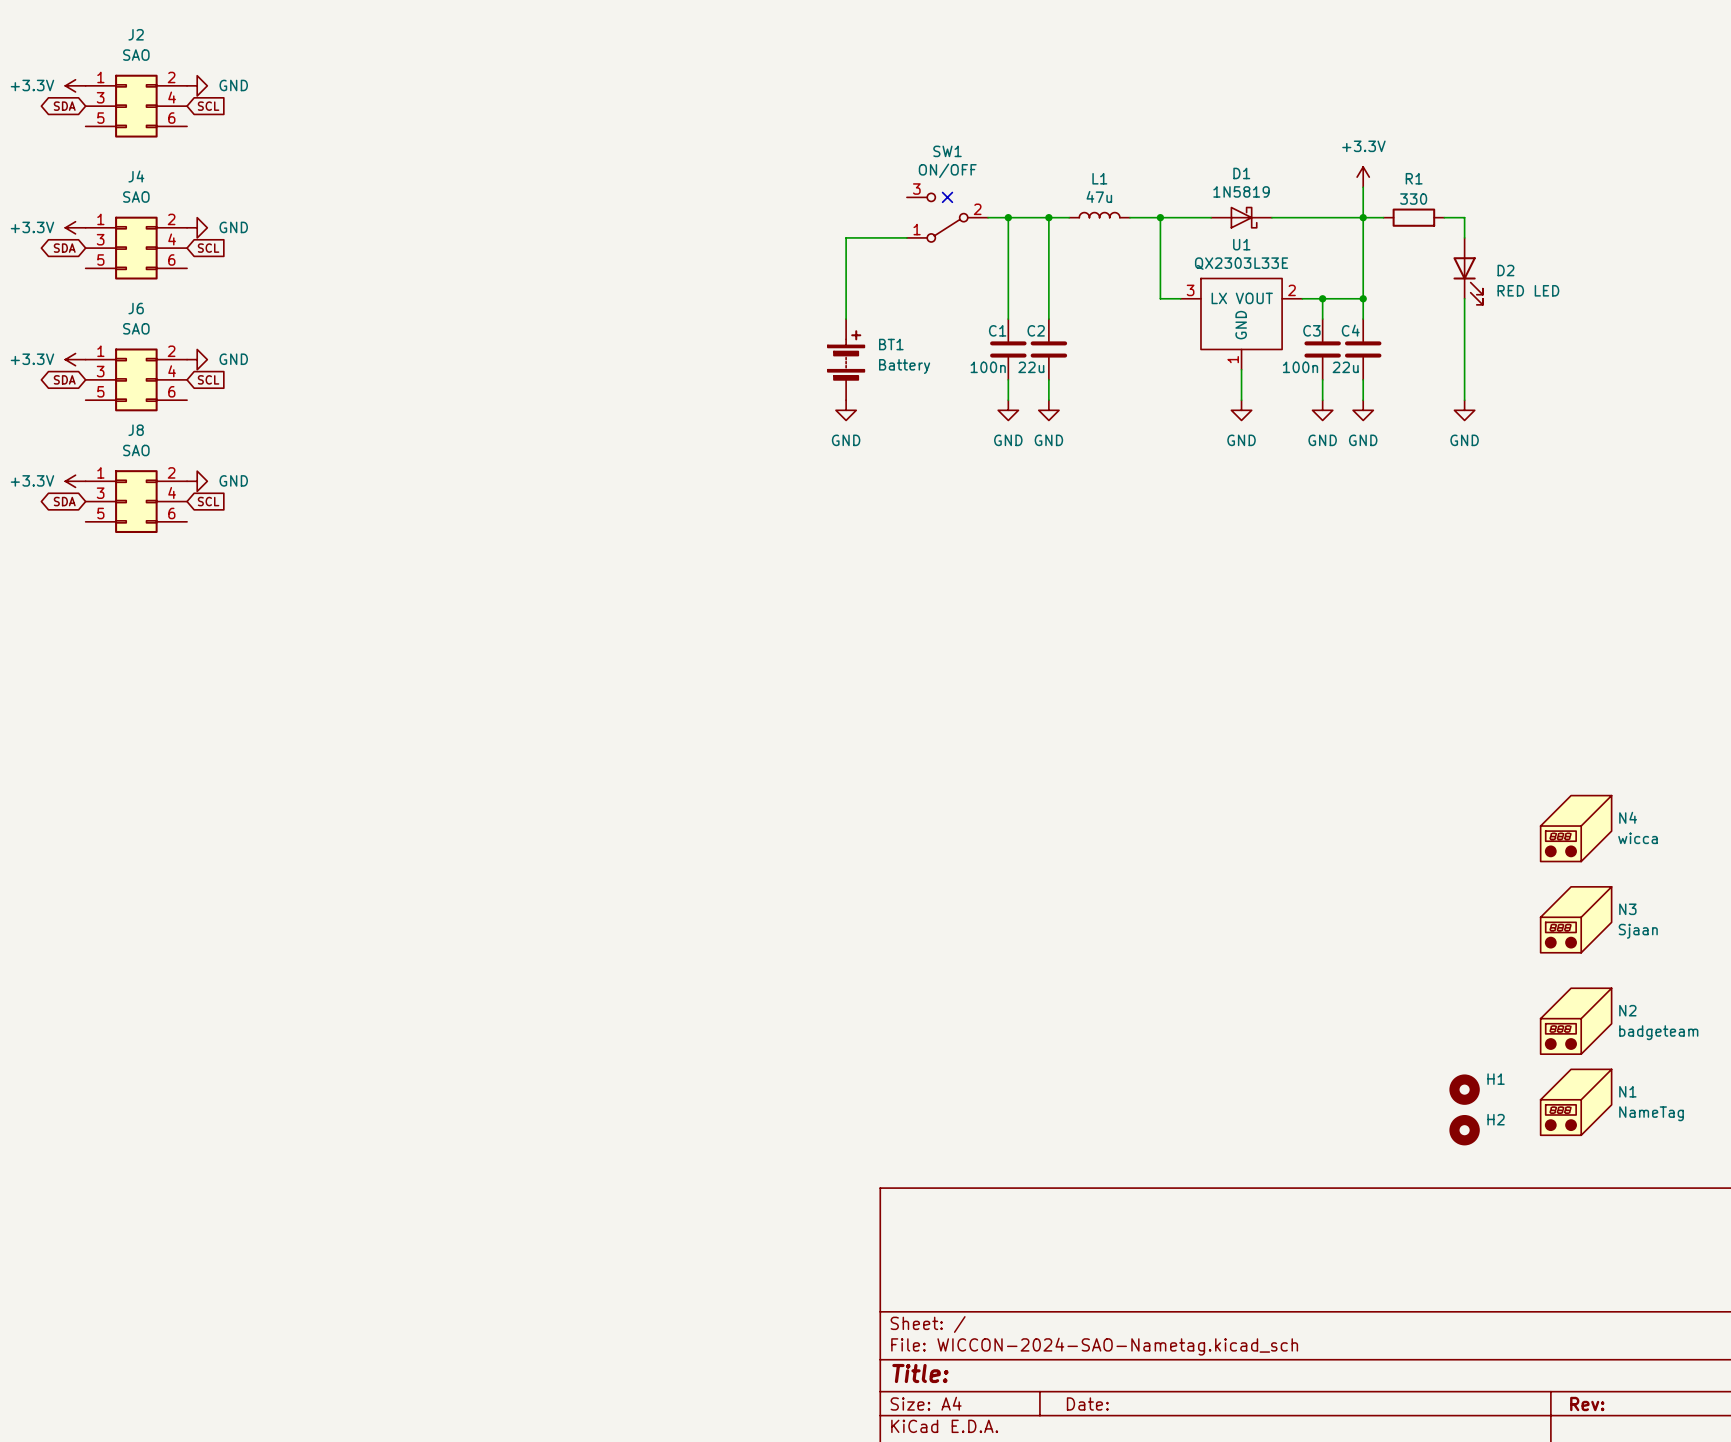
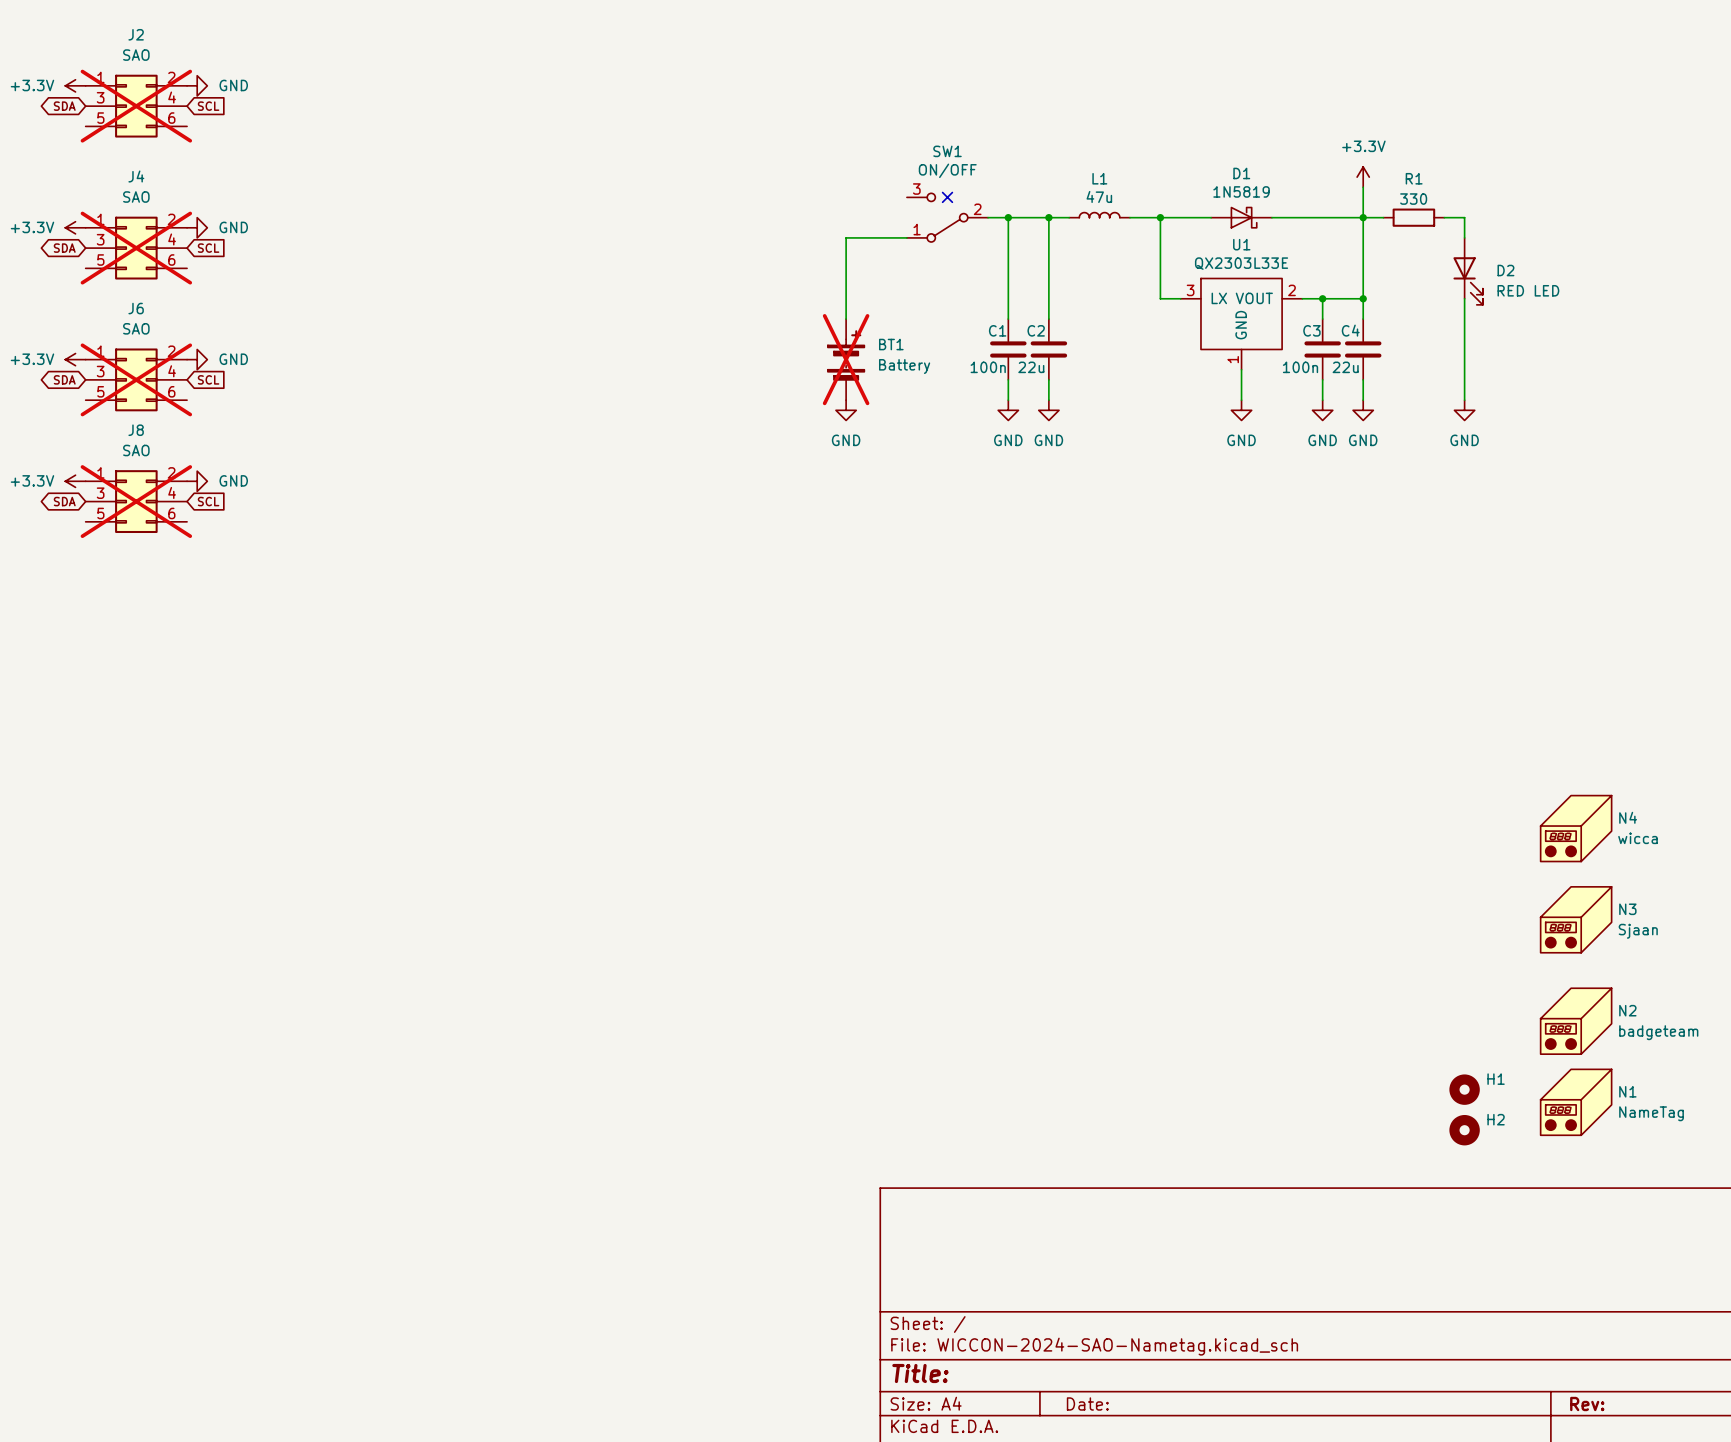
J2 do-not-place cross: none -> (136, 106)
J4 do-not-place cross: none -> (136, 248)
BT1 do-not-place cross: none -> (846, 359)
J6 do-not-place cross: none -> (136, 379)
J8 do-not-place cross: none -> (136, 501)

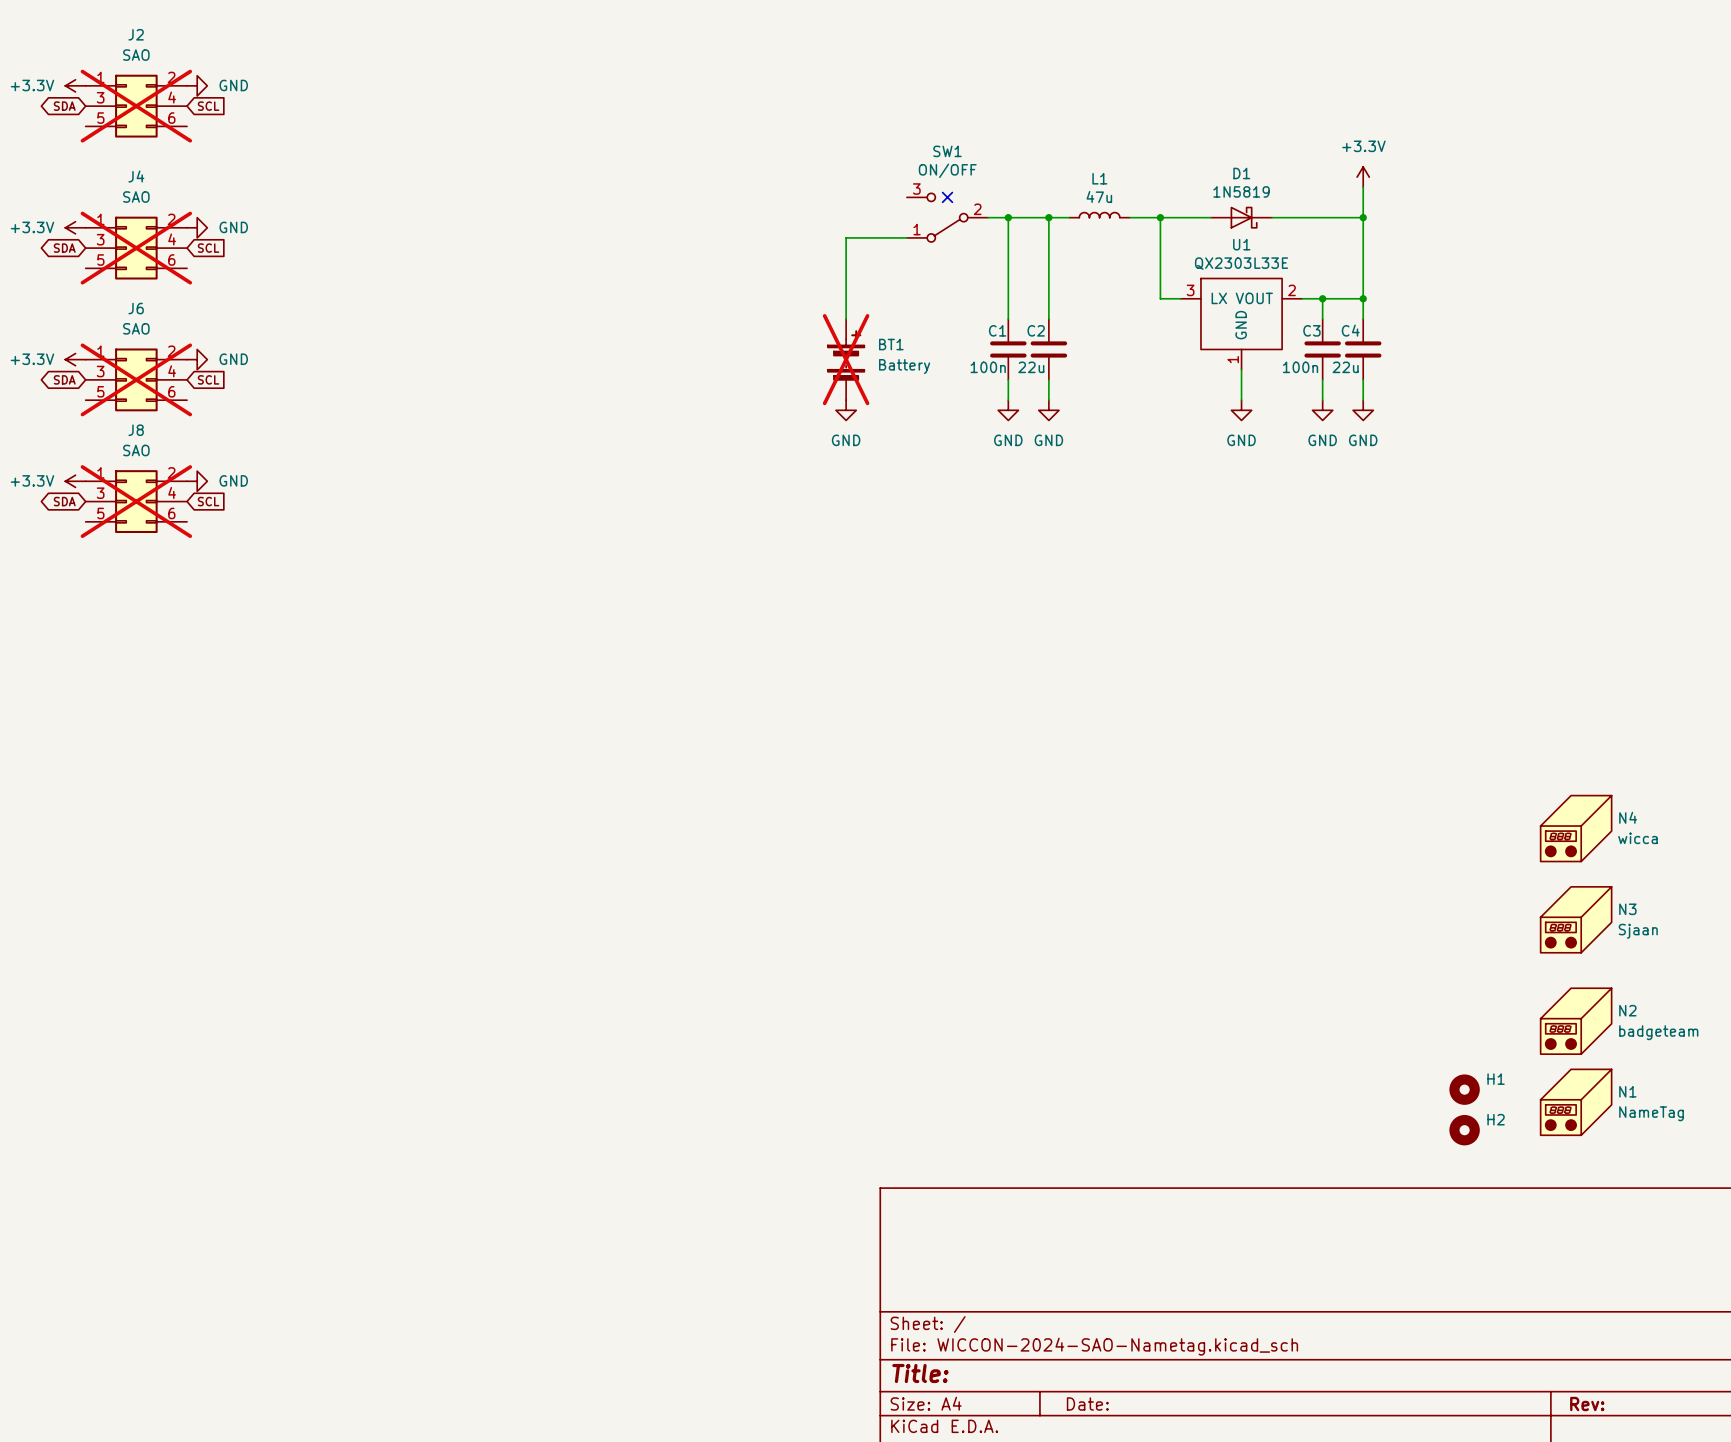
wire: (1363, 217) (1383, 217) -> none
R1: 330 (1413, 217) -> none
wire: (1444, 217) (1464, 217) (1464, 237) -> none
D2: RED LED (1468, 271) -> none
wire: (1464, 298) (1464, 400) -> none
power symbol: GND (1464, 410) -> none

